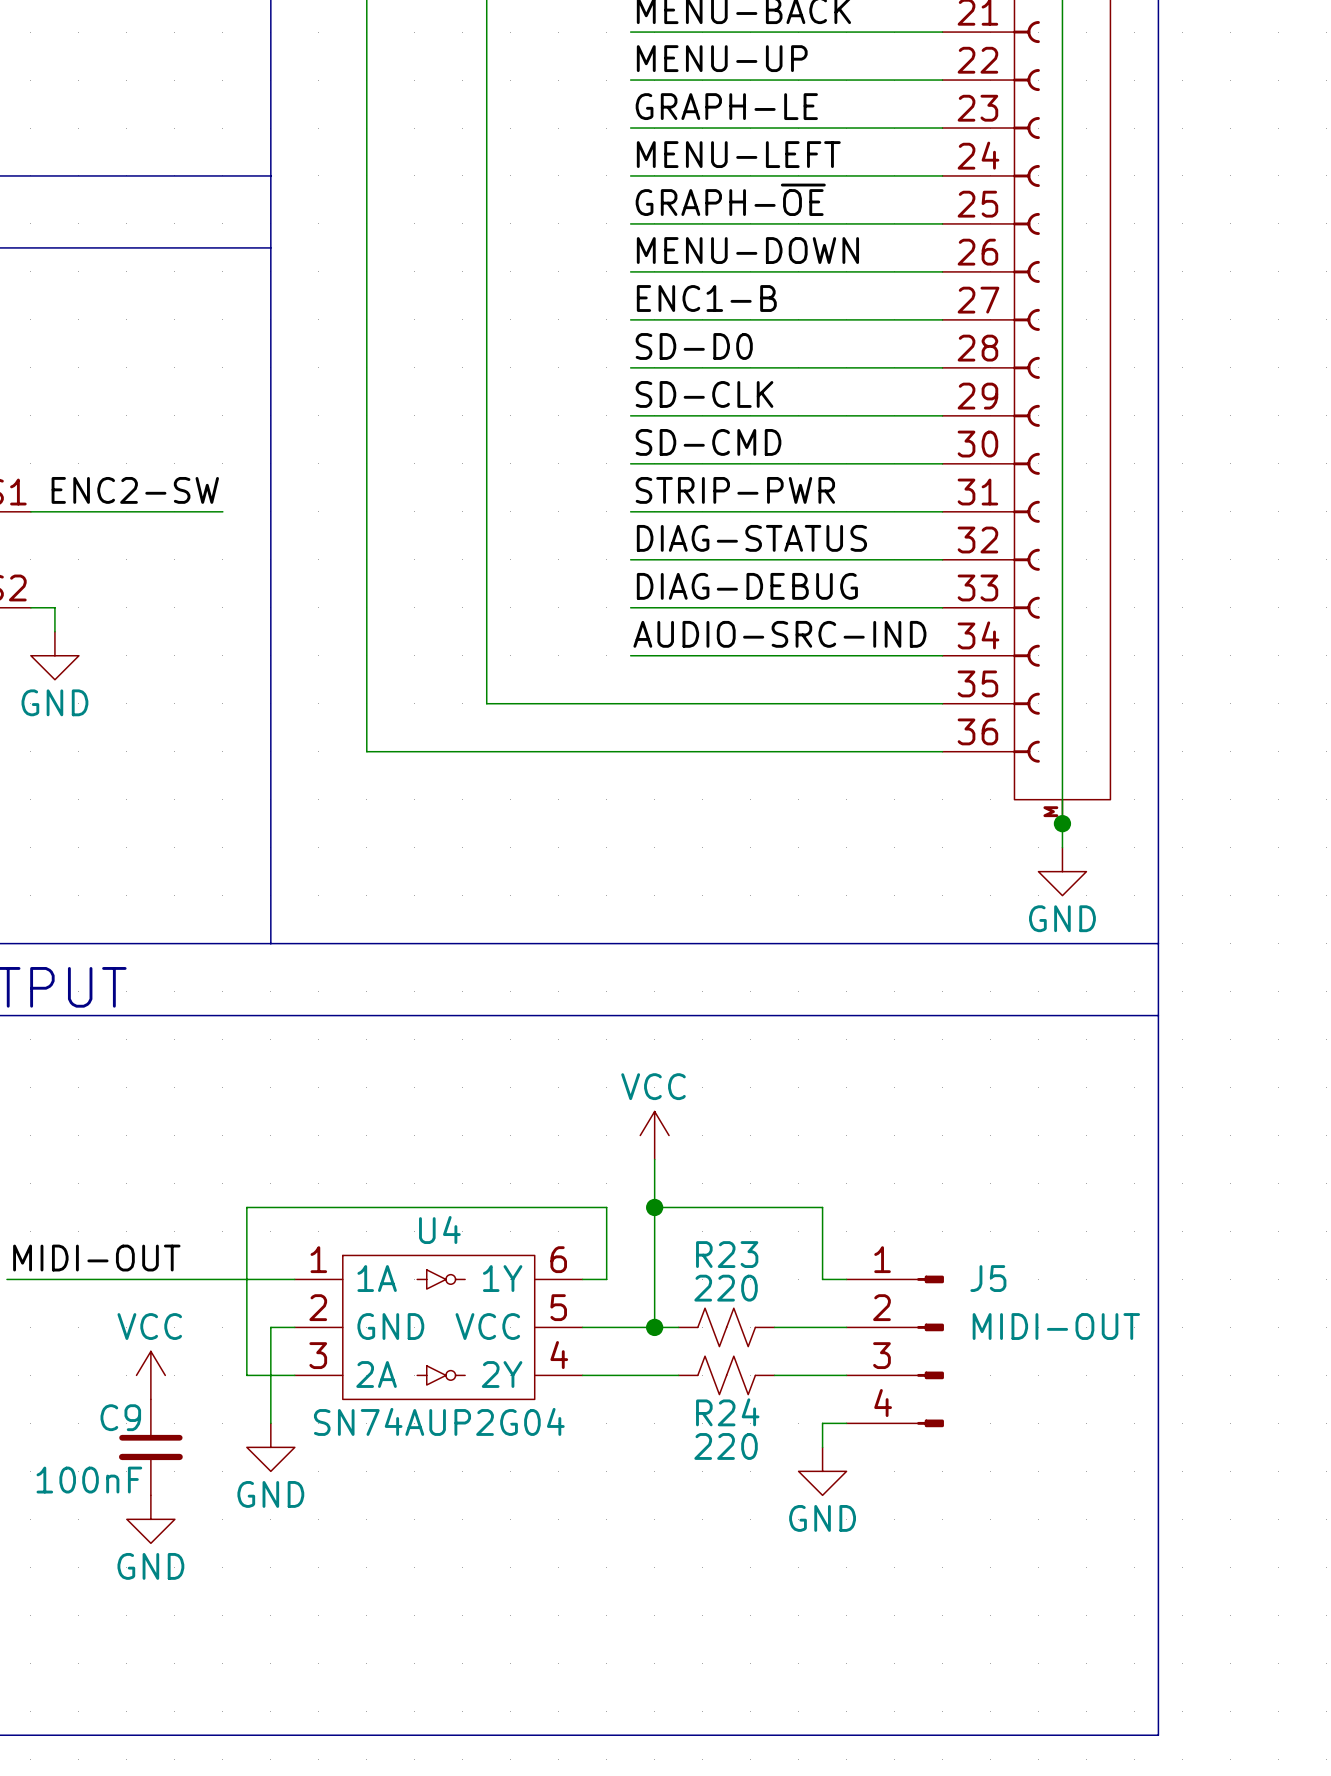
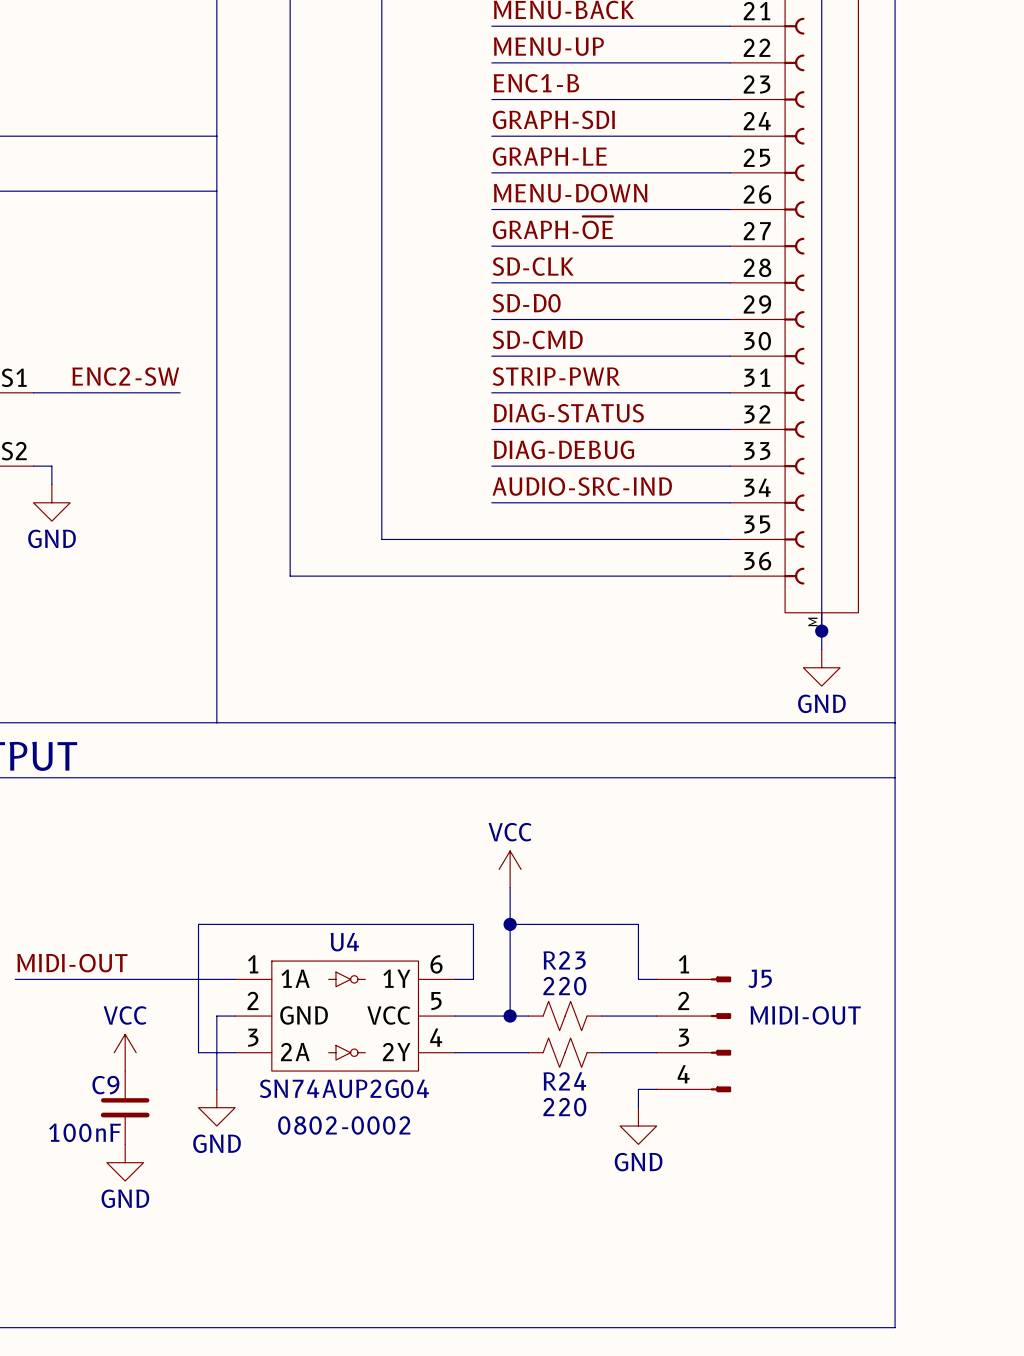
label: GRAPH-LE (726, 106) -> ENC1-B (536, 83)
label: MENU-LEFT (738, 154) -> GRAPH-SDI (553, 119)
label: GRAPH-~{OE} (730, 199) -> GRAPH-LE (549, 156)
label: ENC1-B (706, 298) -> GRAPH-~{OE} (552, 227)
label: SD-D0 (694, 346) -> SD-CLK (533, 266)
label: SD-CLK (704, 394) -> SD-D0 (526, 303)
U4 text: none -> 0802-0002 (344, 1125)

